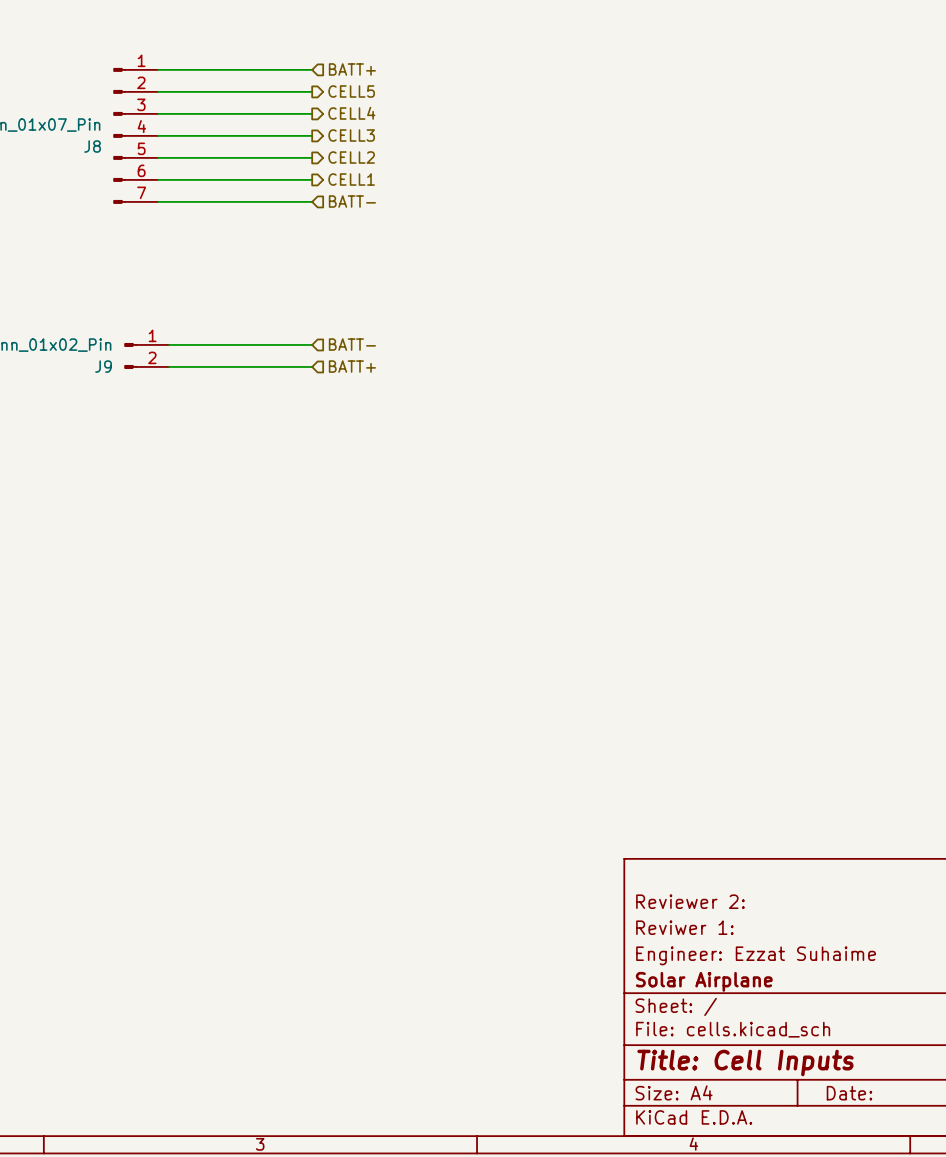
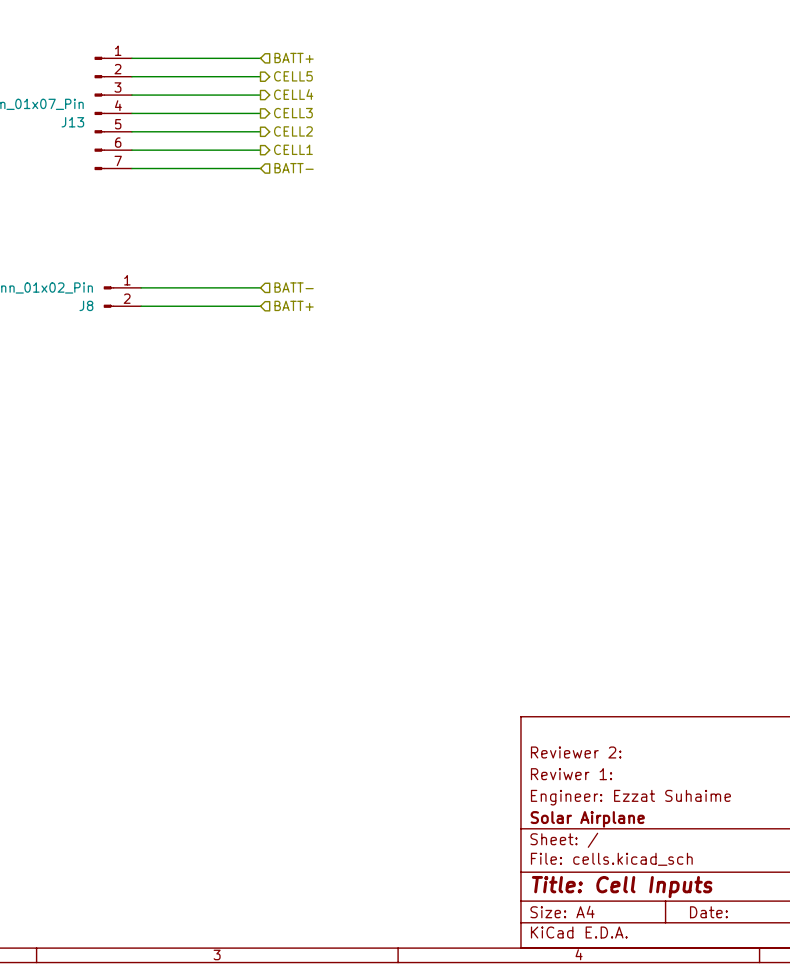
J8 name: J8 (92, 146) -> J13 (72, 122)
J9 name: J9 (103, 366) -> J8 (86, 305)

